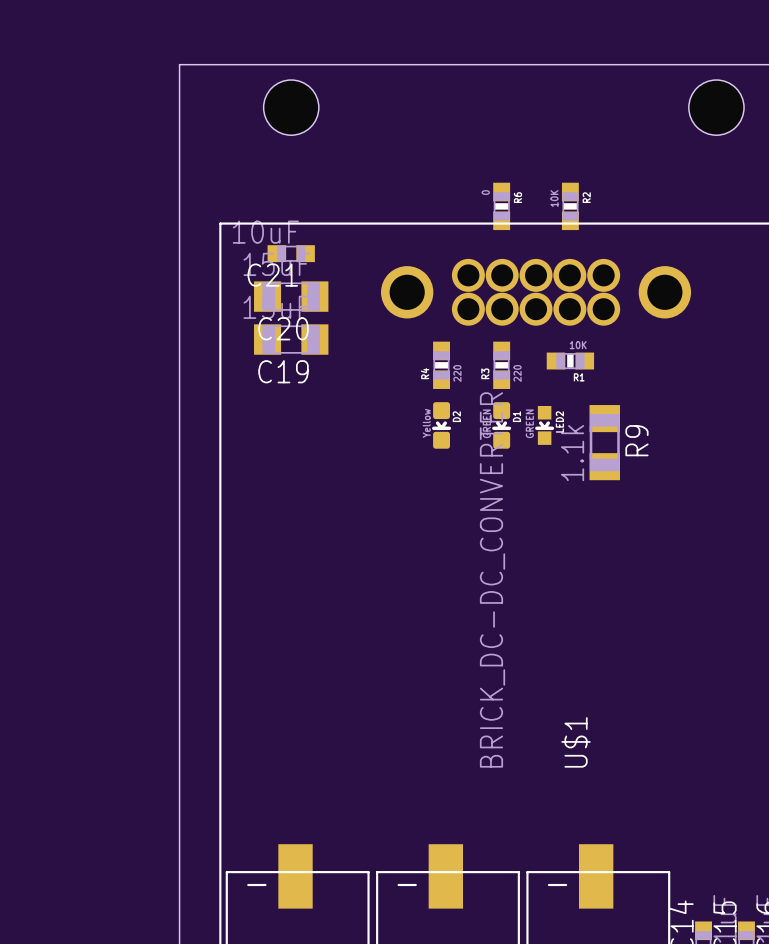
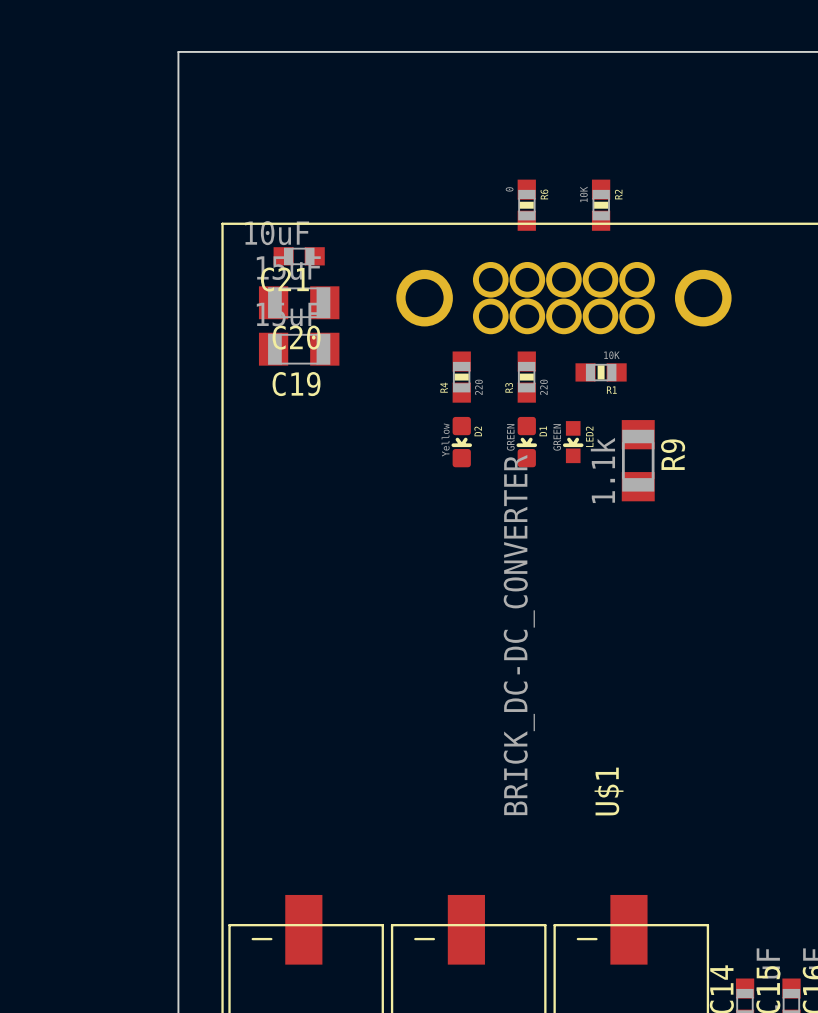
hole: (291, 107) -> none
hole: (716, 107) -> none

